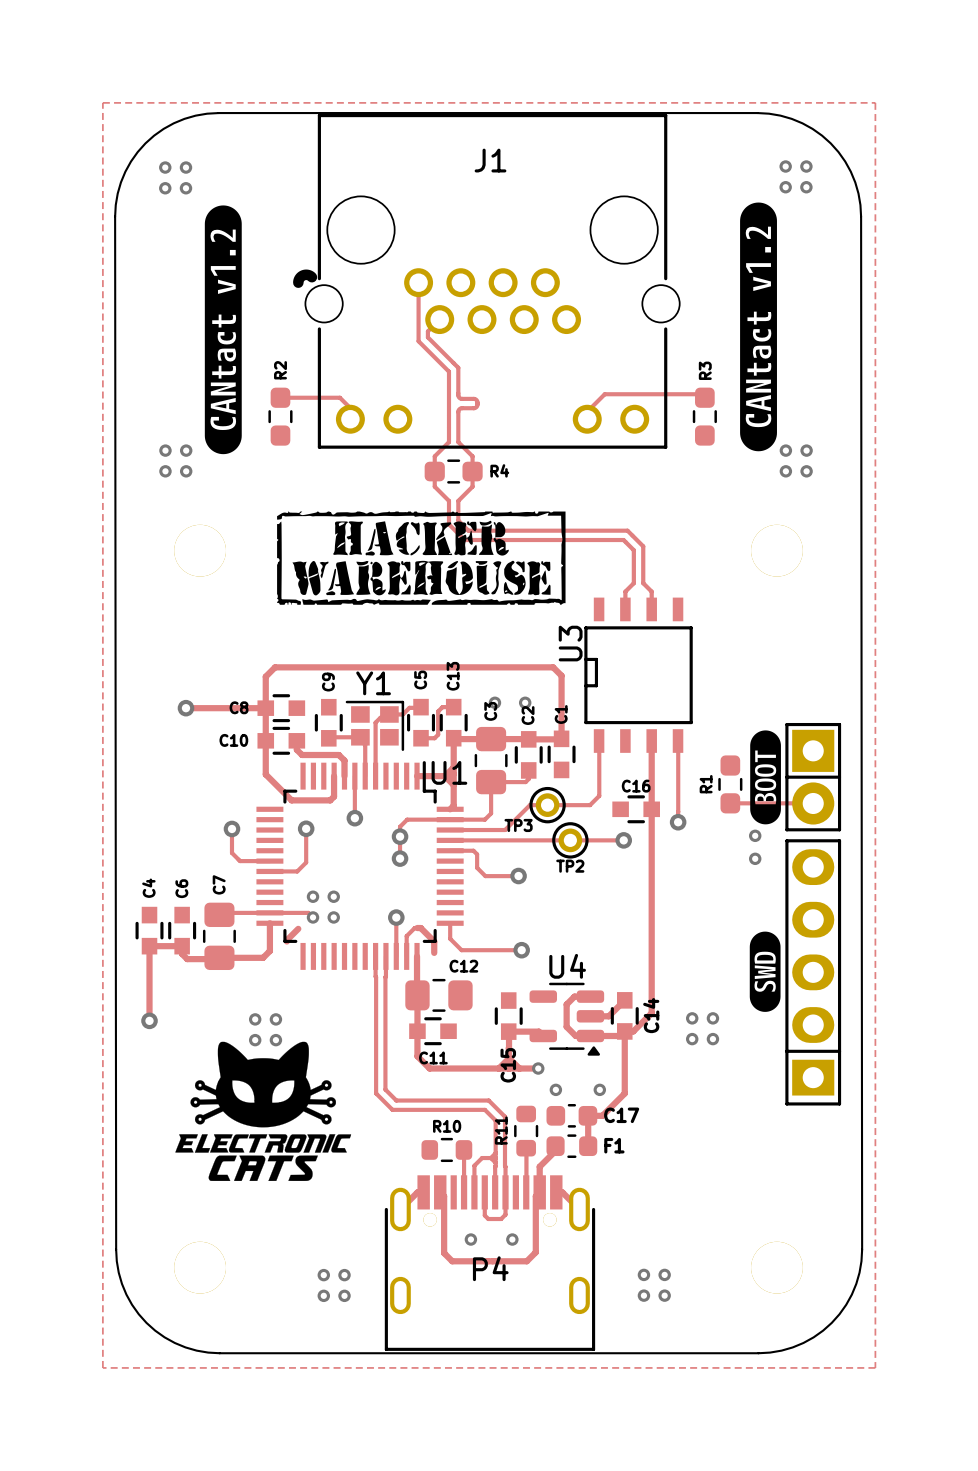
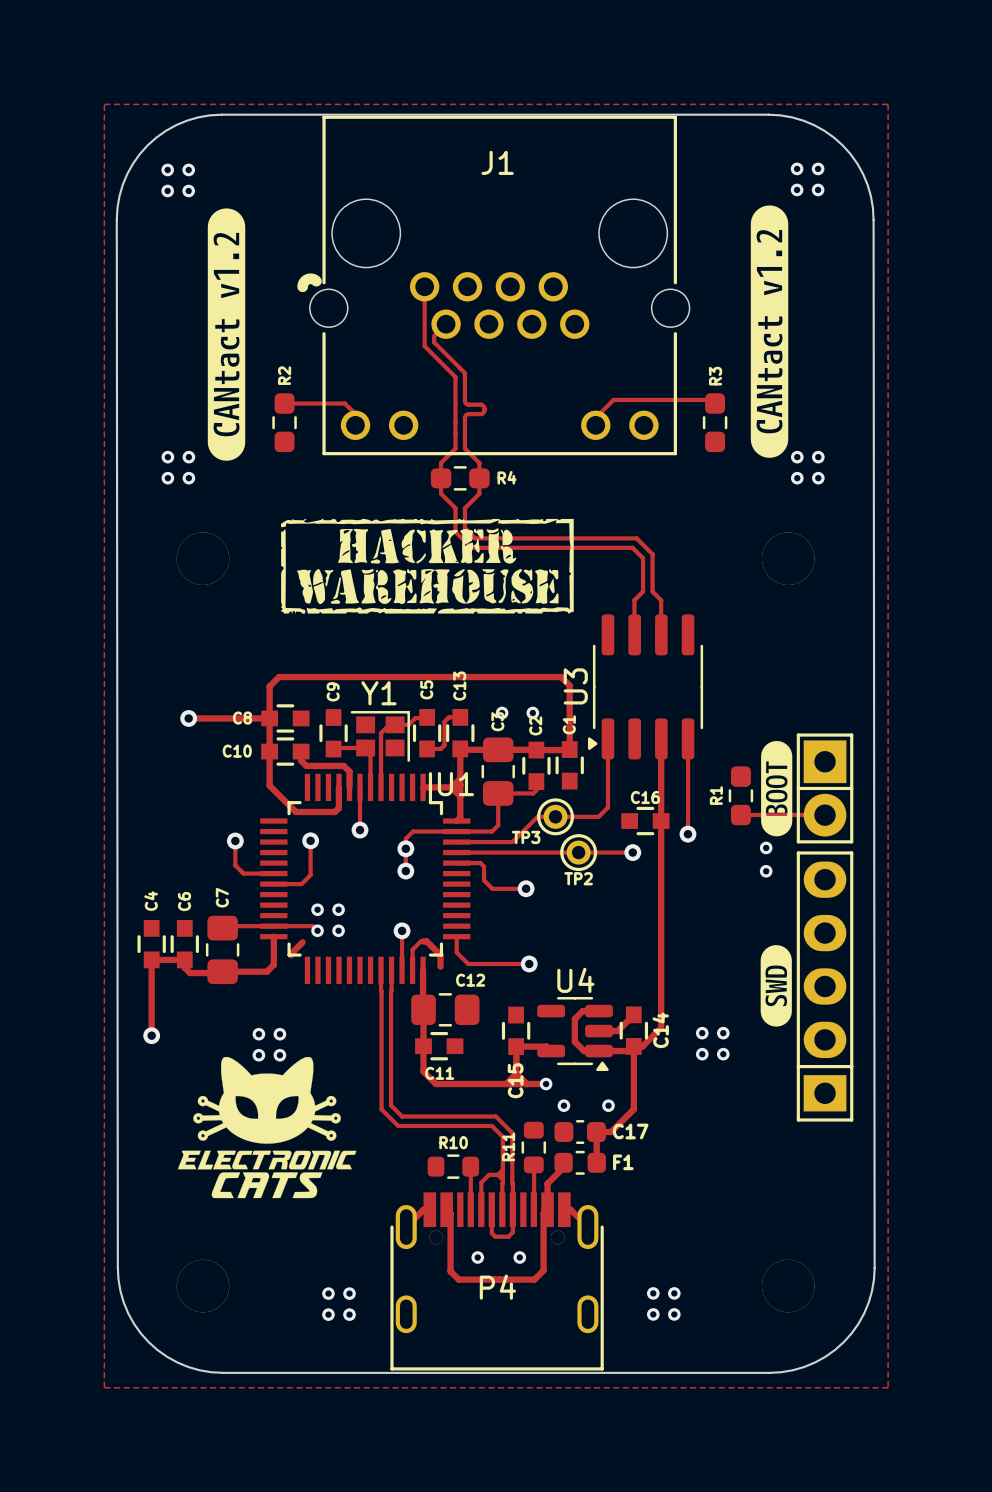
U3 footprint: [584, 597, 693, 753] -> [588, 614, 704, 760]

